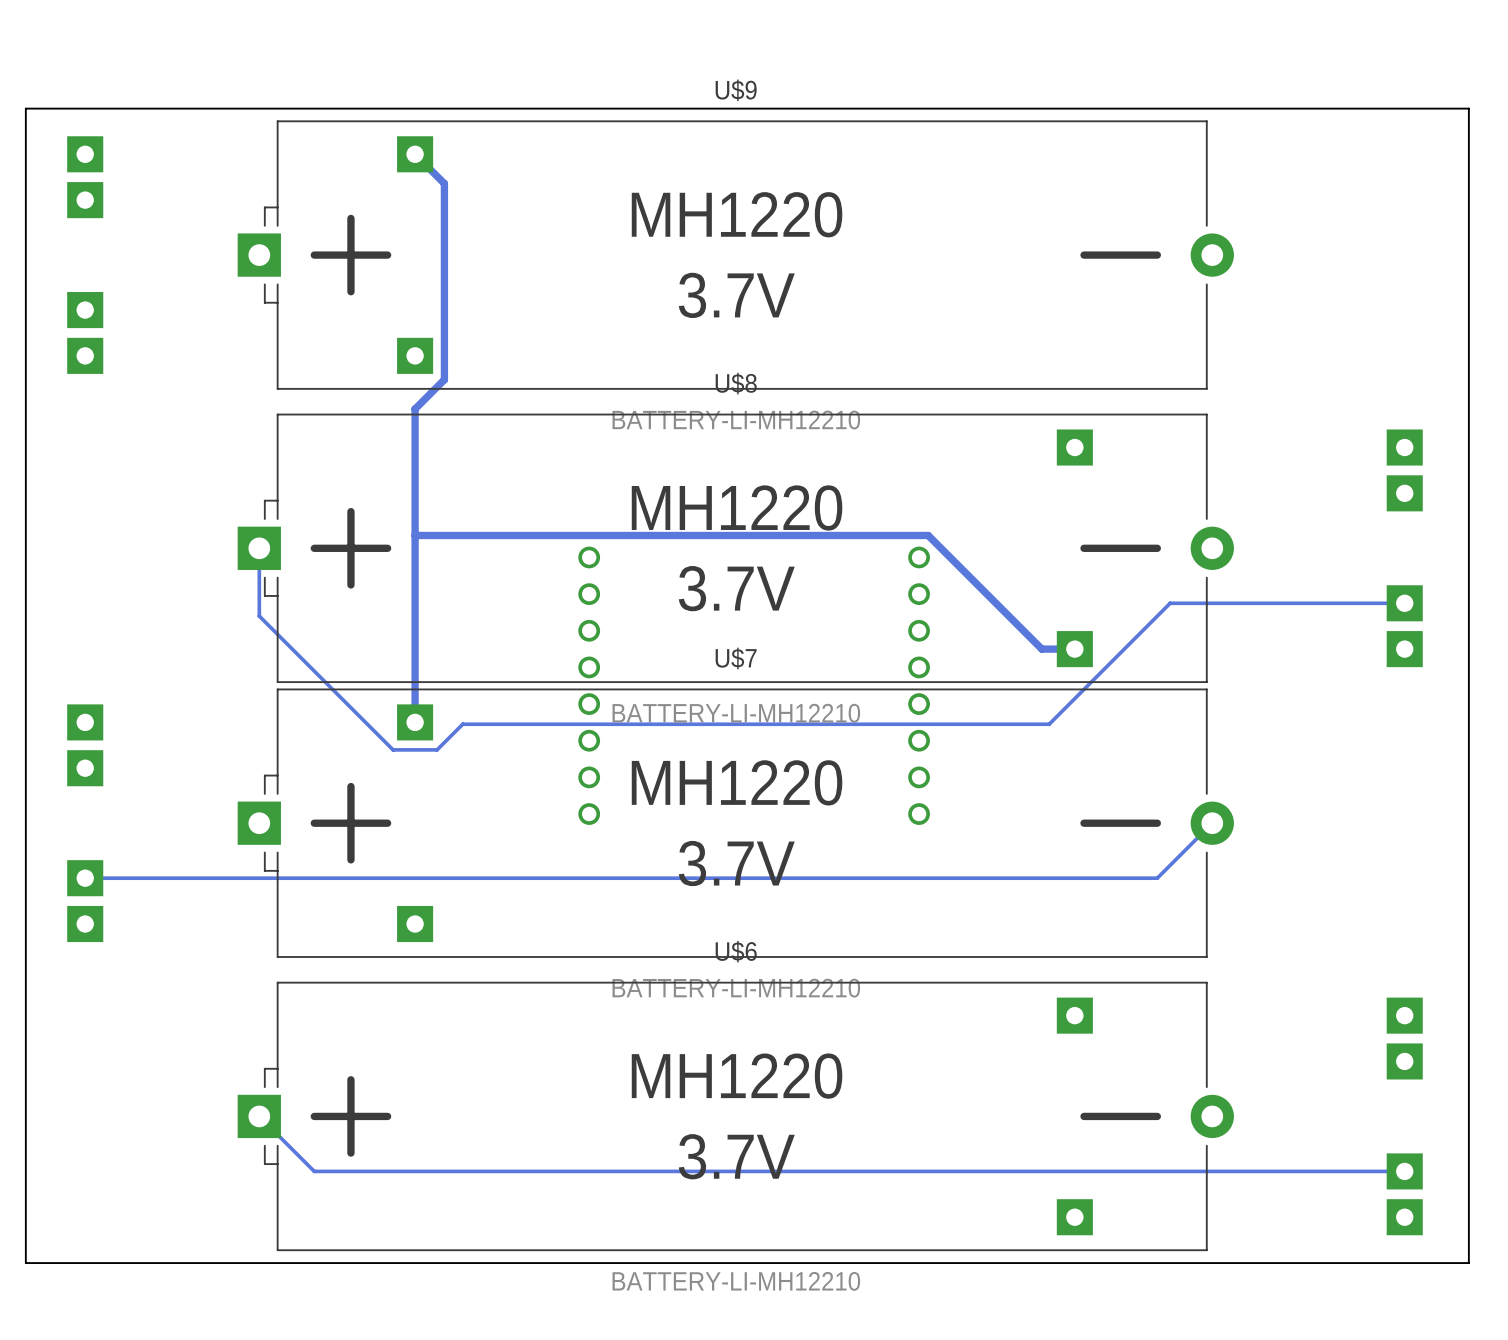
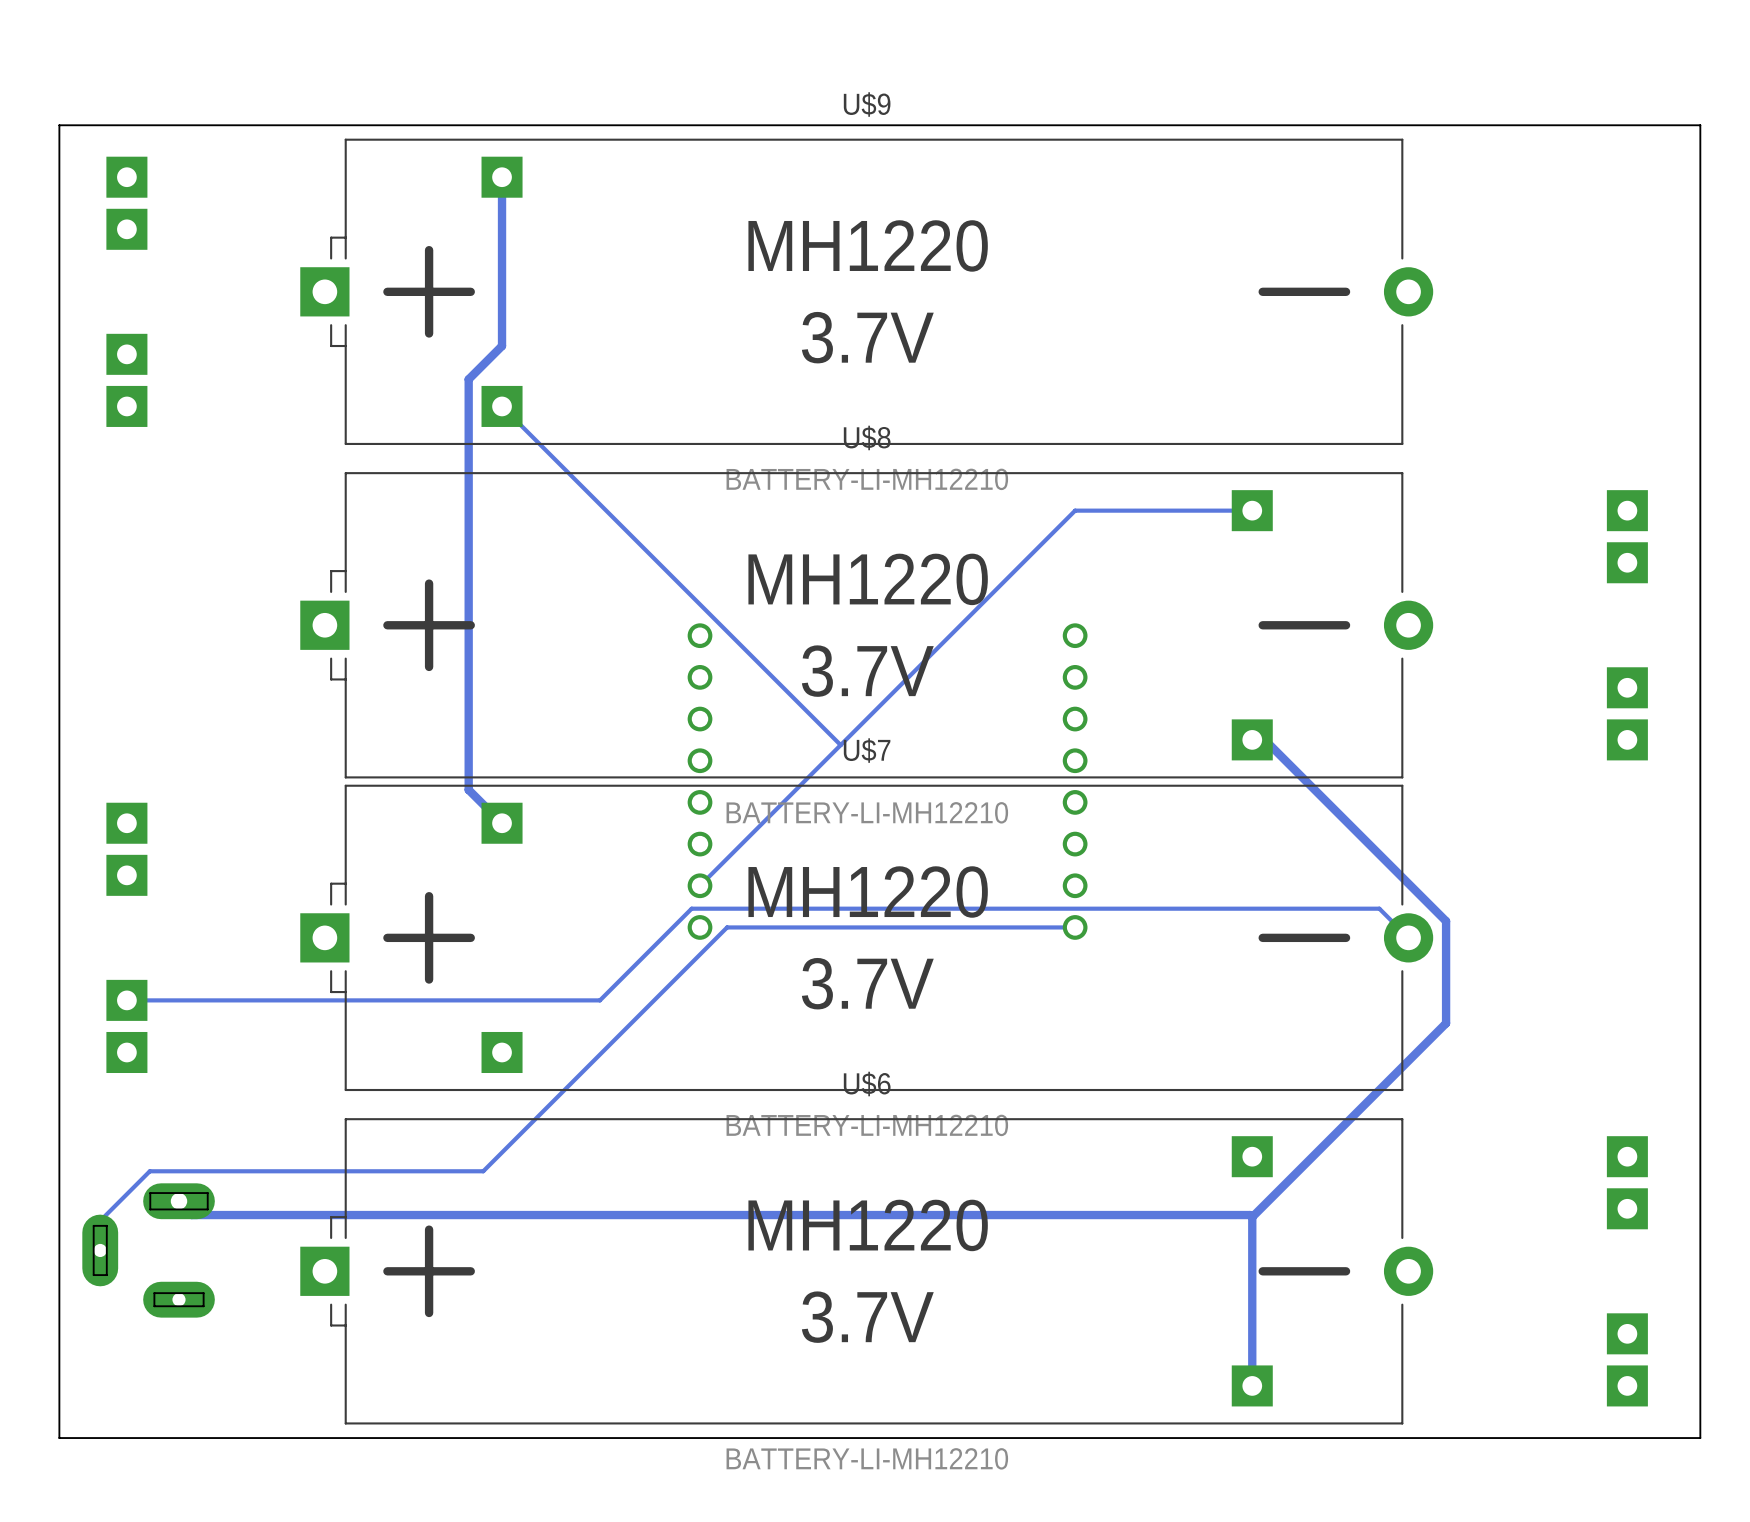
track: (415, 154) (444, 183) (444, 379) (415, 409) (415, 722) -> (502, 177) (502, 346) (468, 379) (468, 789) (502, 823)
track: none -> (502, 406) (840, 745)
track: none -> (1252, 510) (1075, 510) (700, 885)
track: (415, 535) (928, 535) (1041, 649) (1074, 649) -> (1252, 1217) (1446, 1023) (1446, 921) (1264, 739) (1252, 739)
track: (259, 548) (259, 616) (393, 749) (437, 749) (462, 724) (1049, 724) (1170, 603) (1404, 603) -> none
track: none -> (1075, 927) (727, 927) (483, 1171) (149, 1171) (101, 1219) (101, 1250) (100, 1250)
track: (1212, 823) (1157, 878) (501, 878) -> (1408, 937) (1379, 908) (691, 908) (599, 1000)
track: none -> (179, 1201) (191, 1215) (1250, 1215) (1252, 1217)
track: none -> (1252, 1217) (1252, 1385)
part: none -> (148, 1250)
track: (259, 1116) (314, 1171) (1404, 1171) -> none

